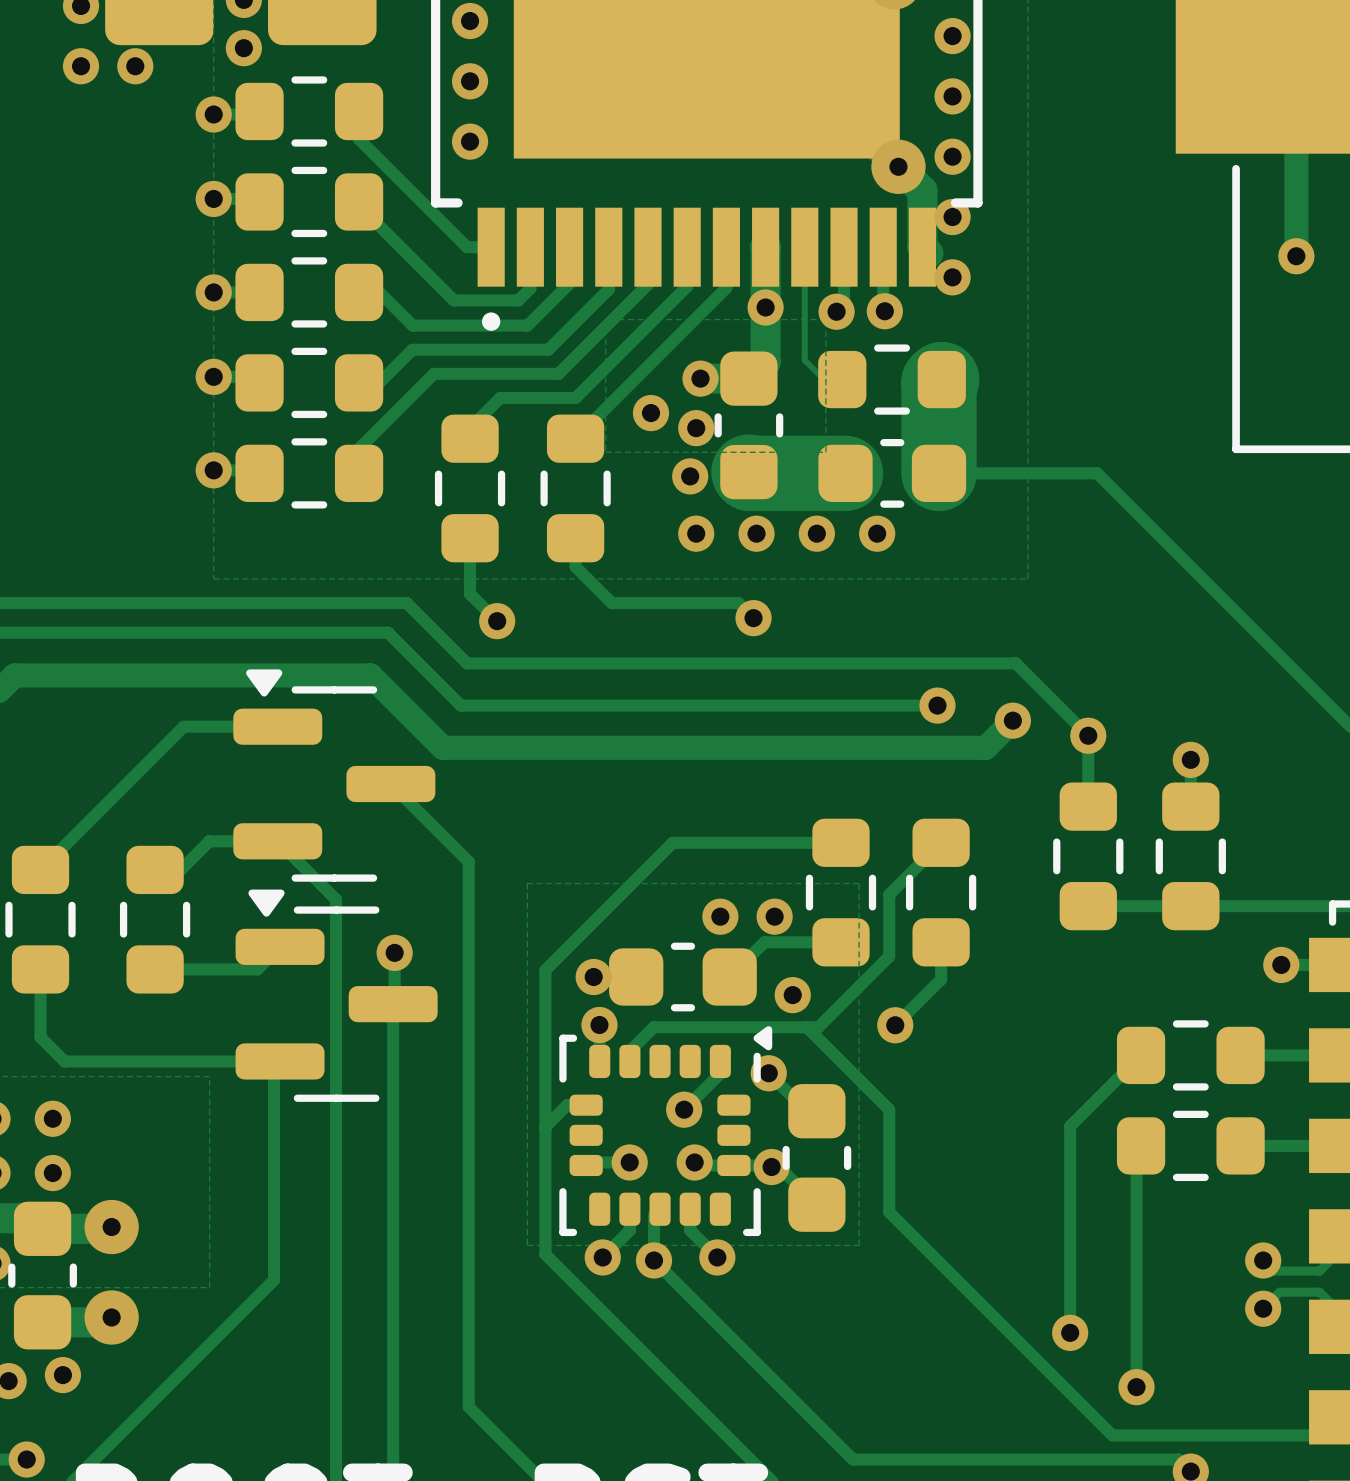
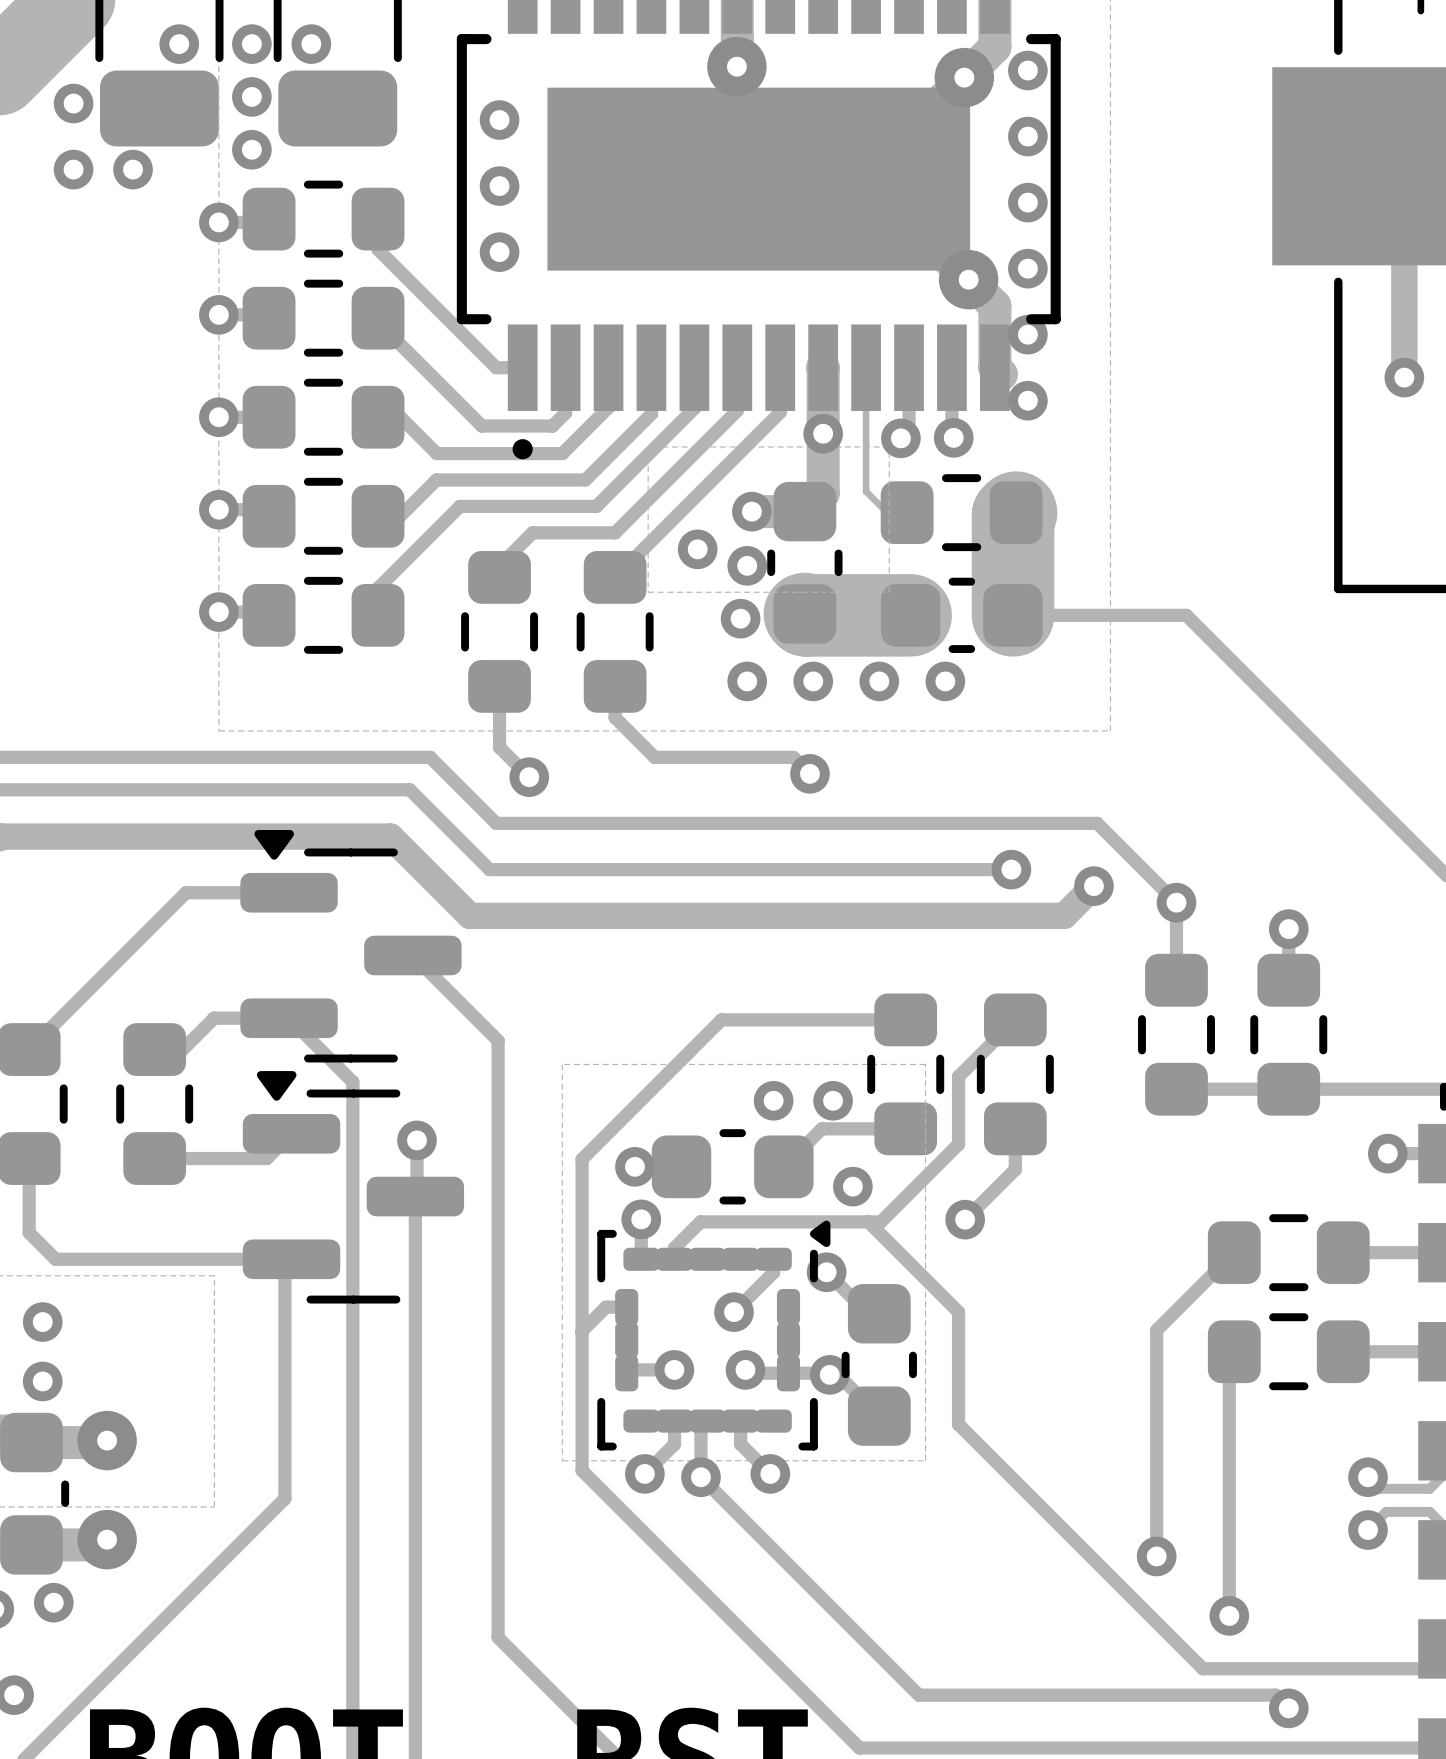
part footprint: [559, 1026, 773, 1237] -> [597, 1220, 831, 1451]

